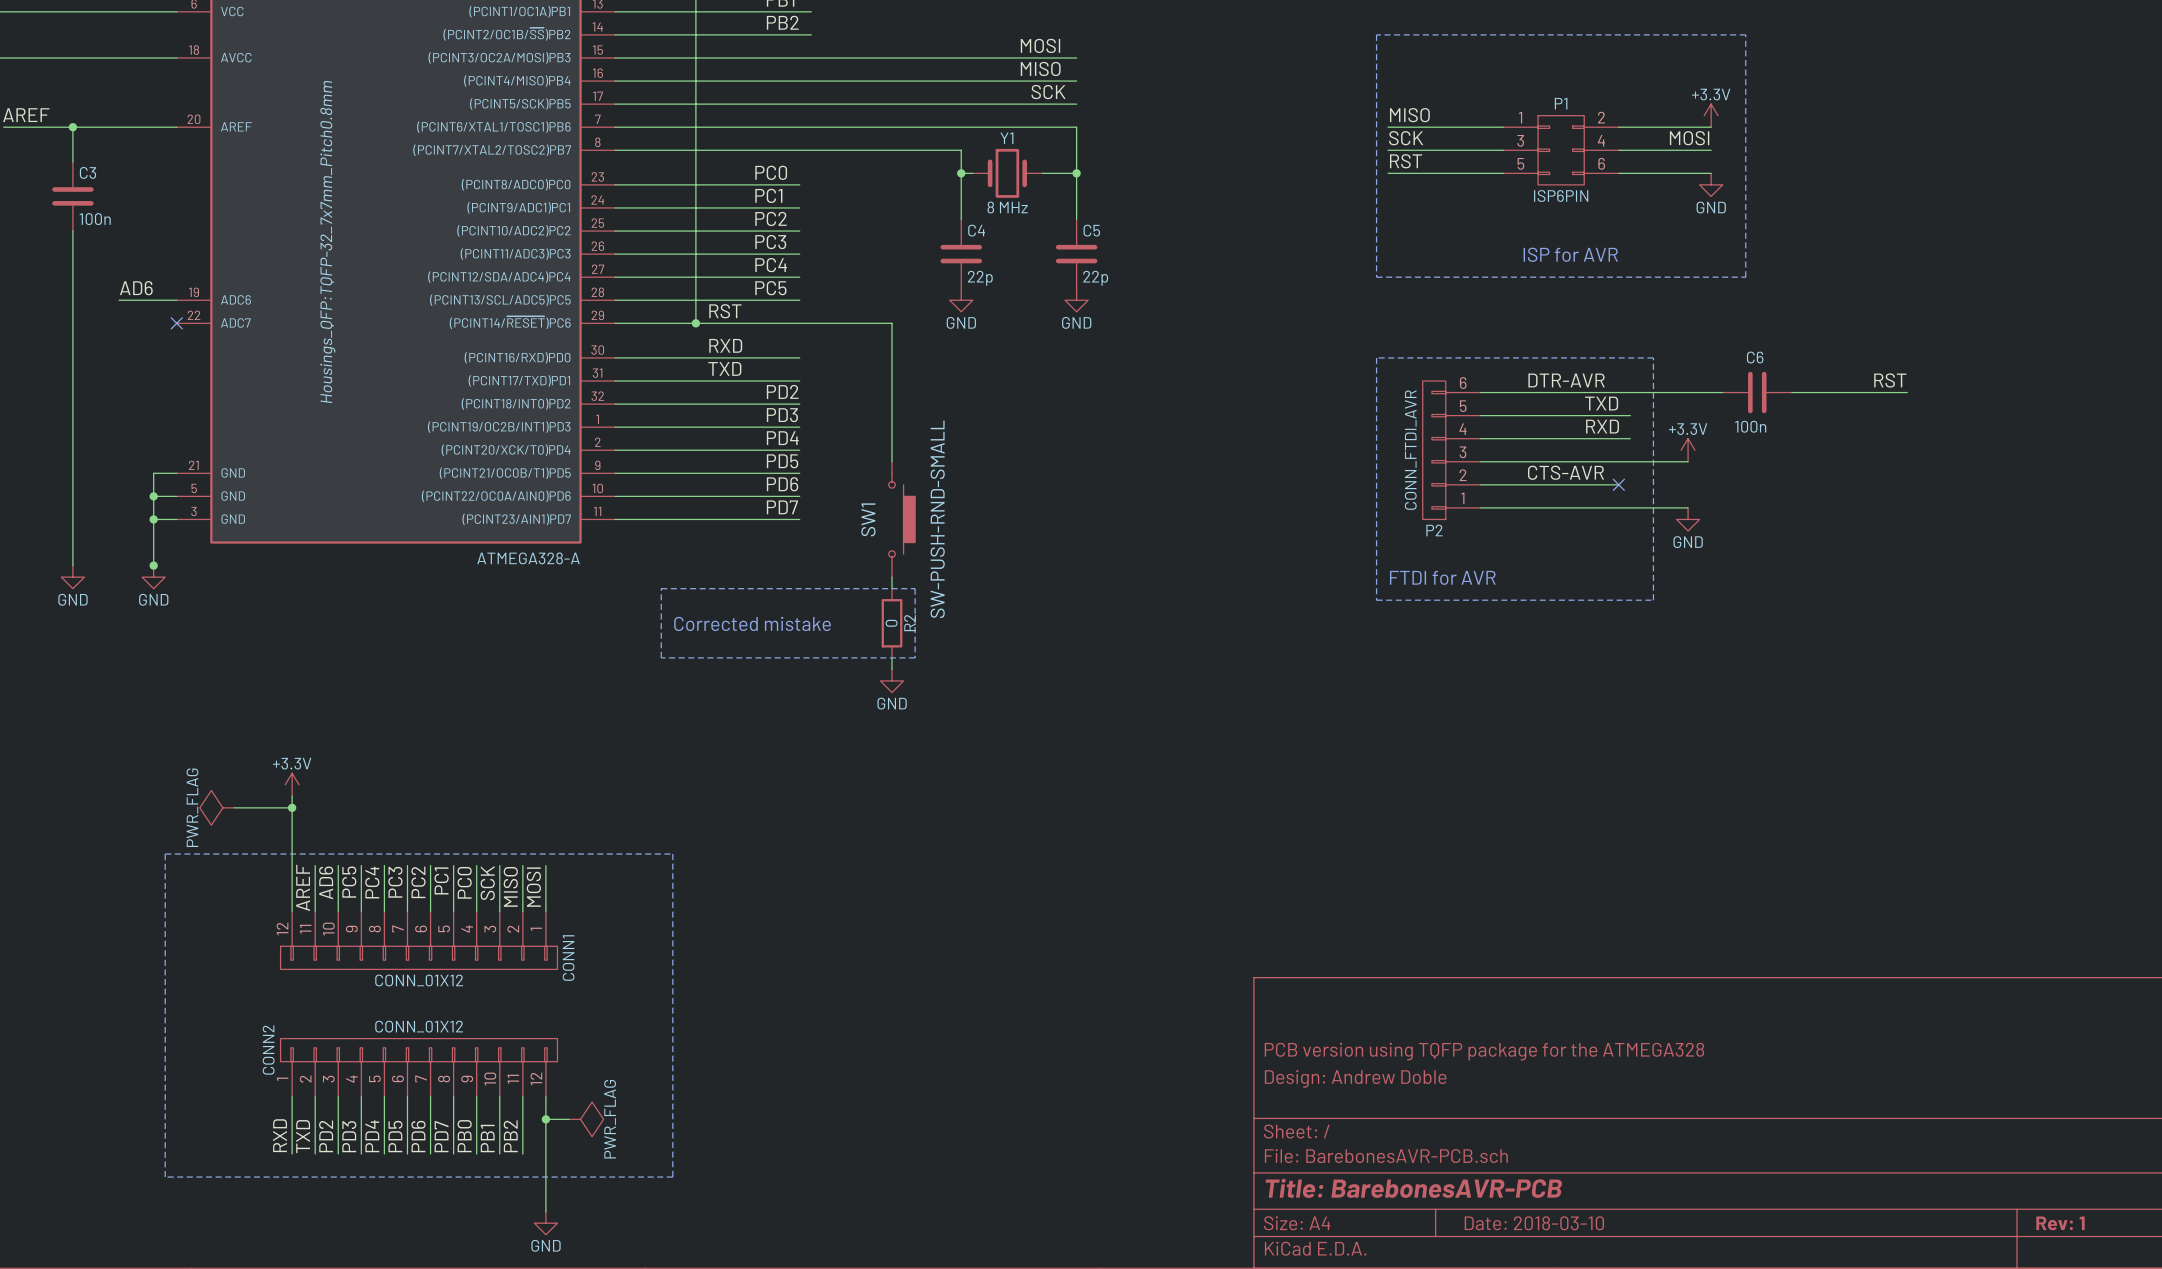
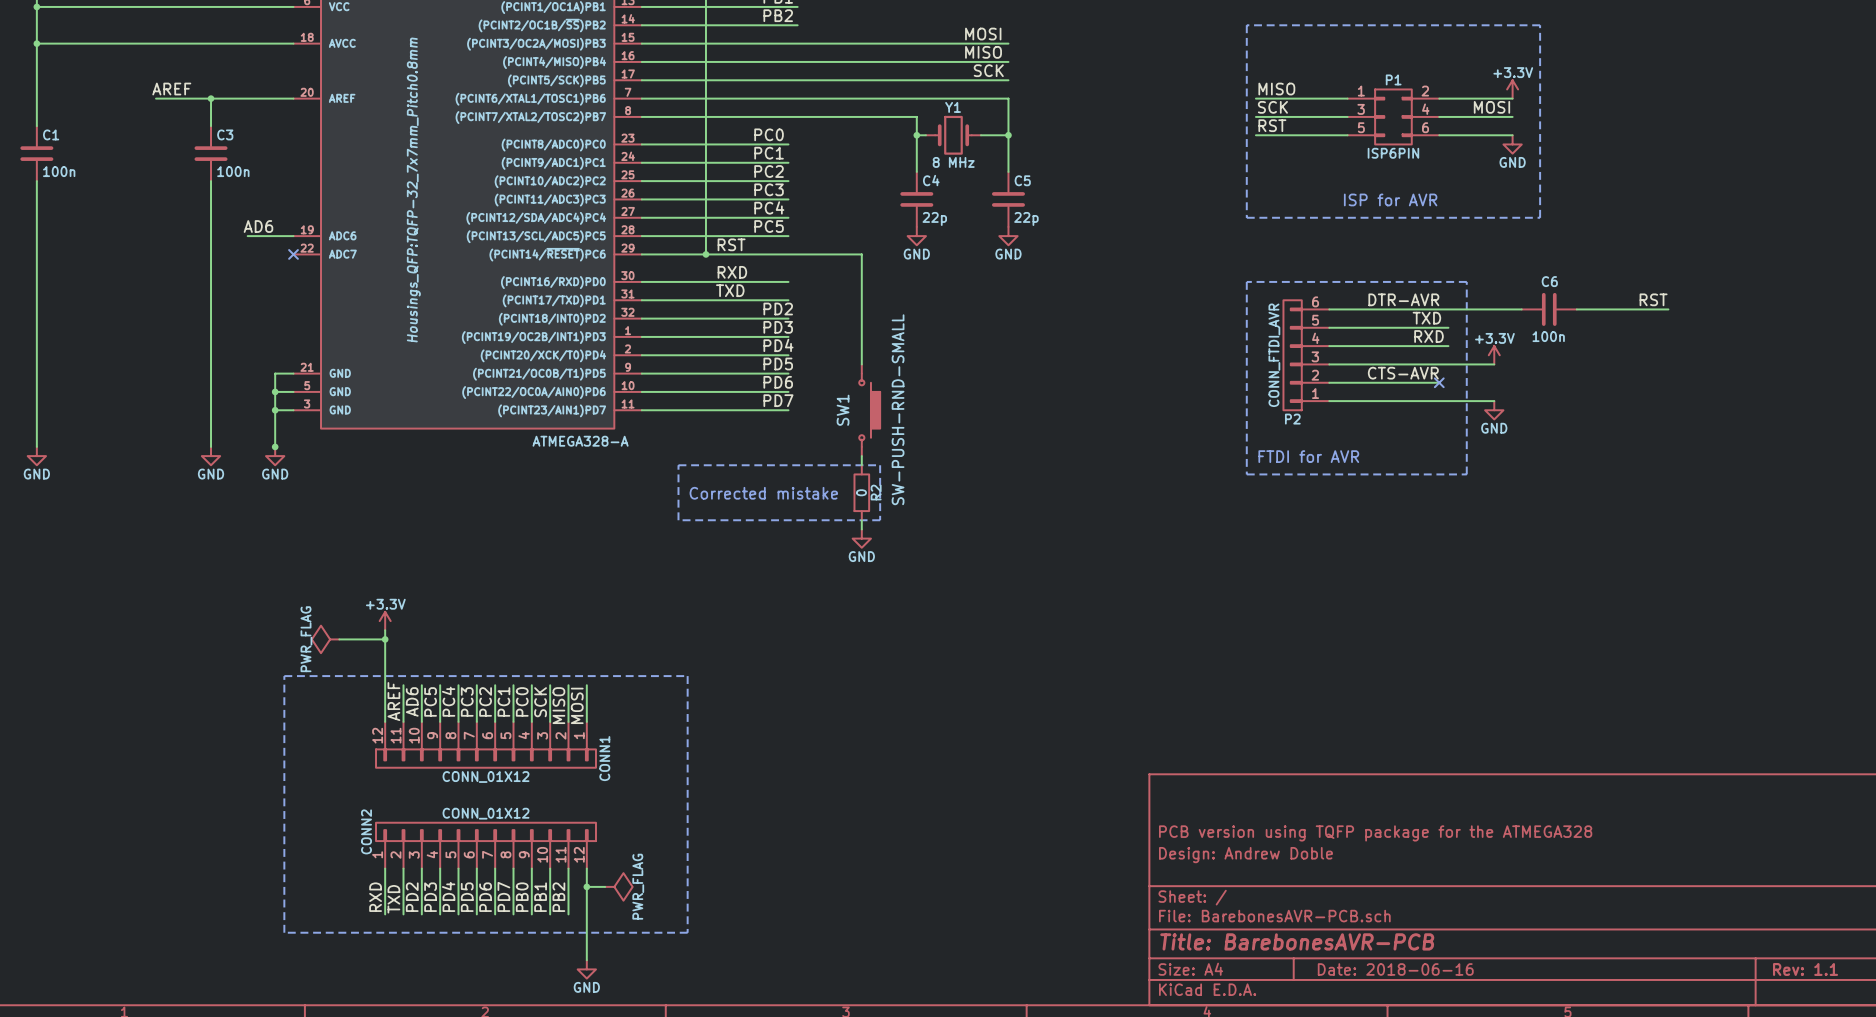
title block: Date: 2018-03-10 (1534, 1223) -> Date: 2018-06-16 (1395, 969)
title block: Rev: 1 (2060, 1223) -> Rev: 1.1 (1805, 969)

